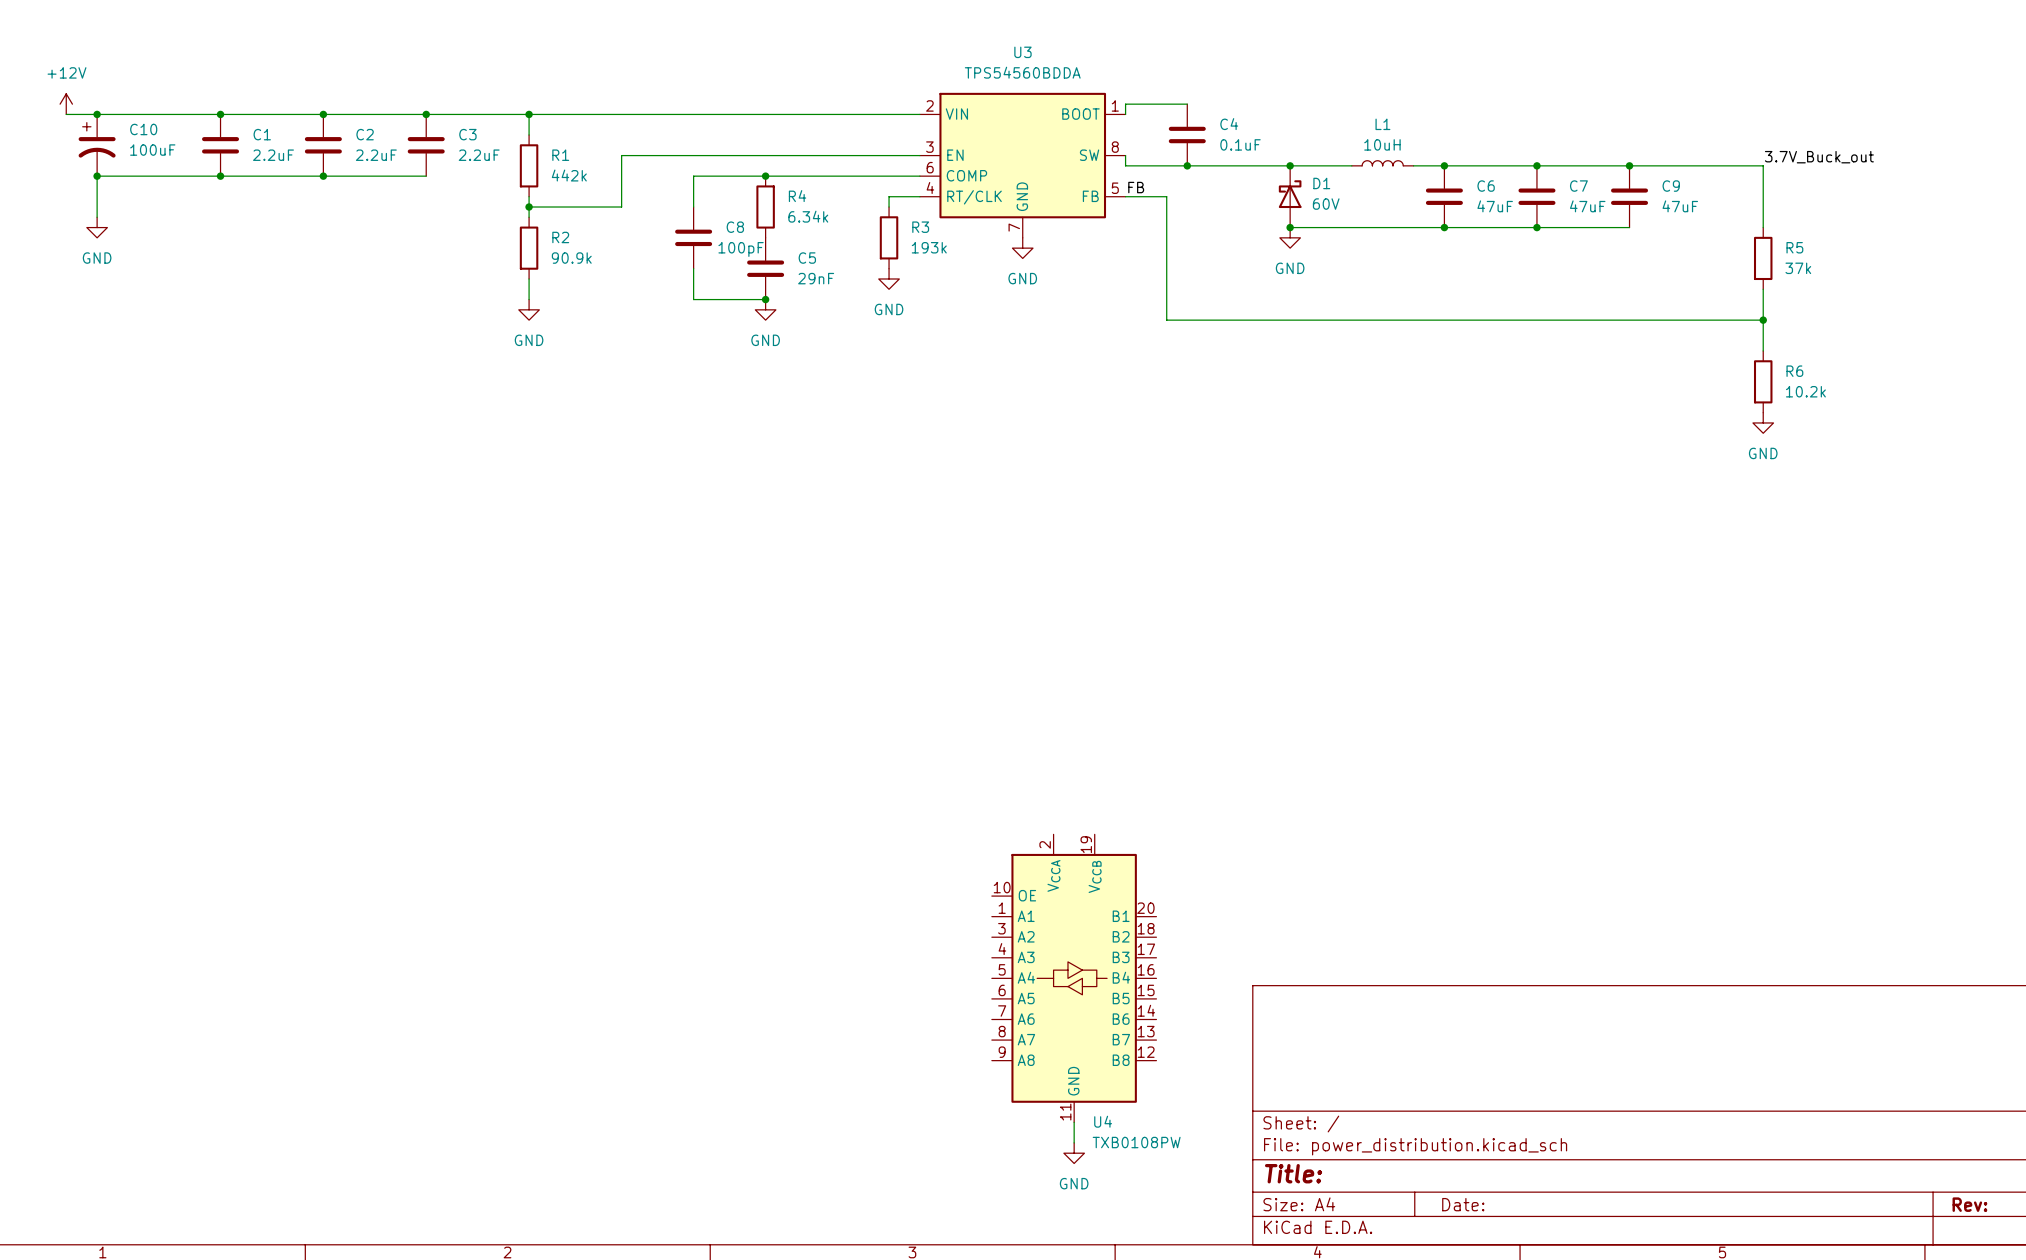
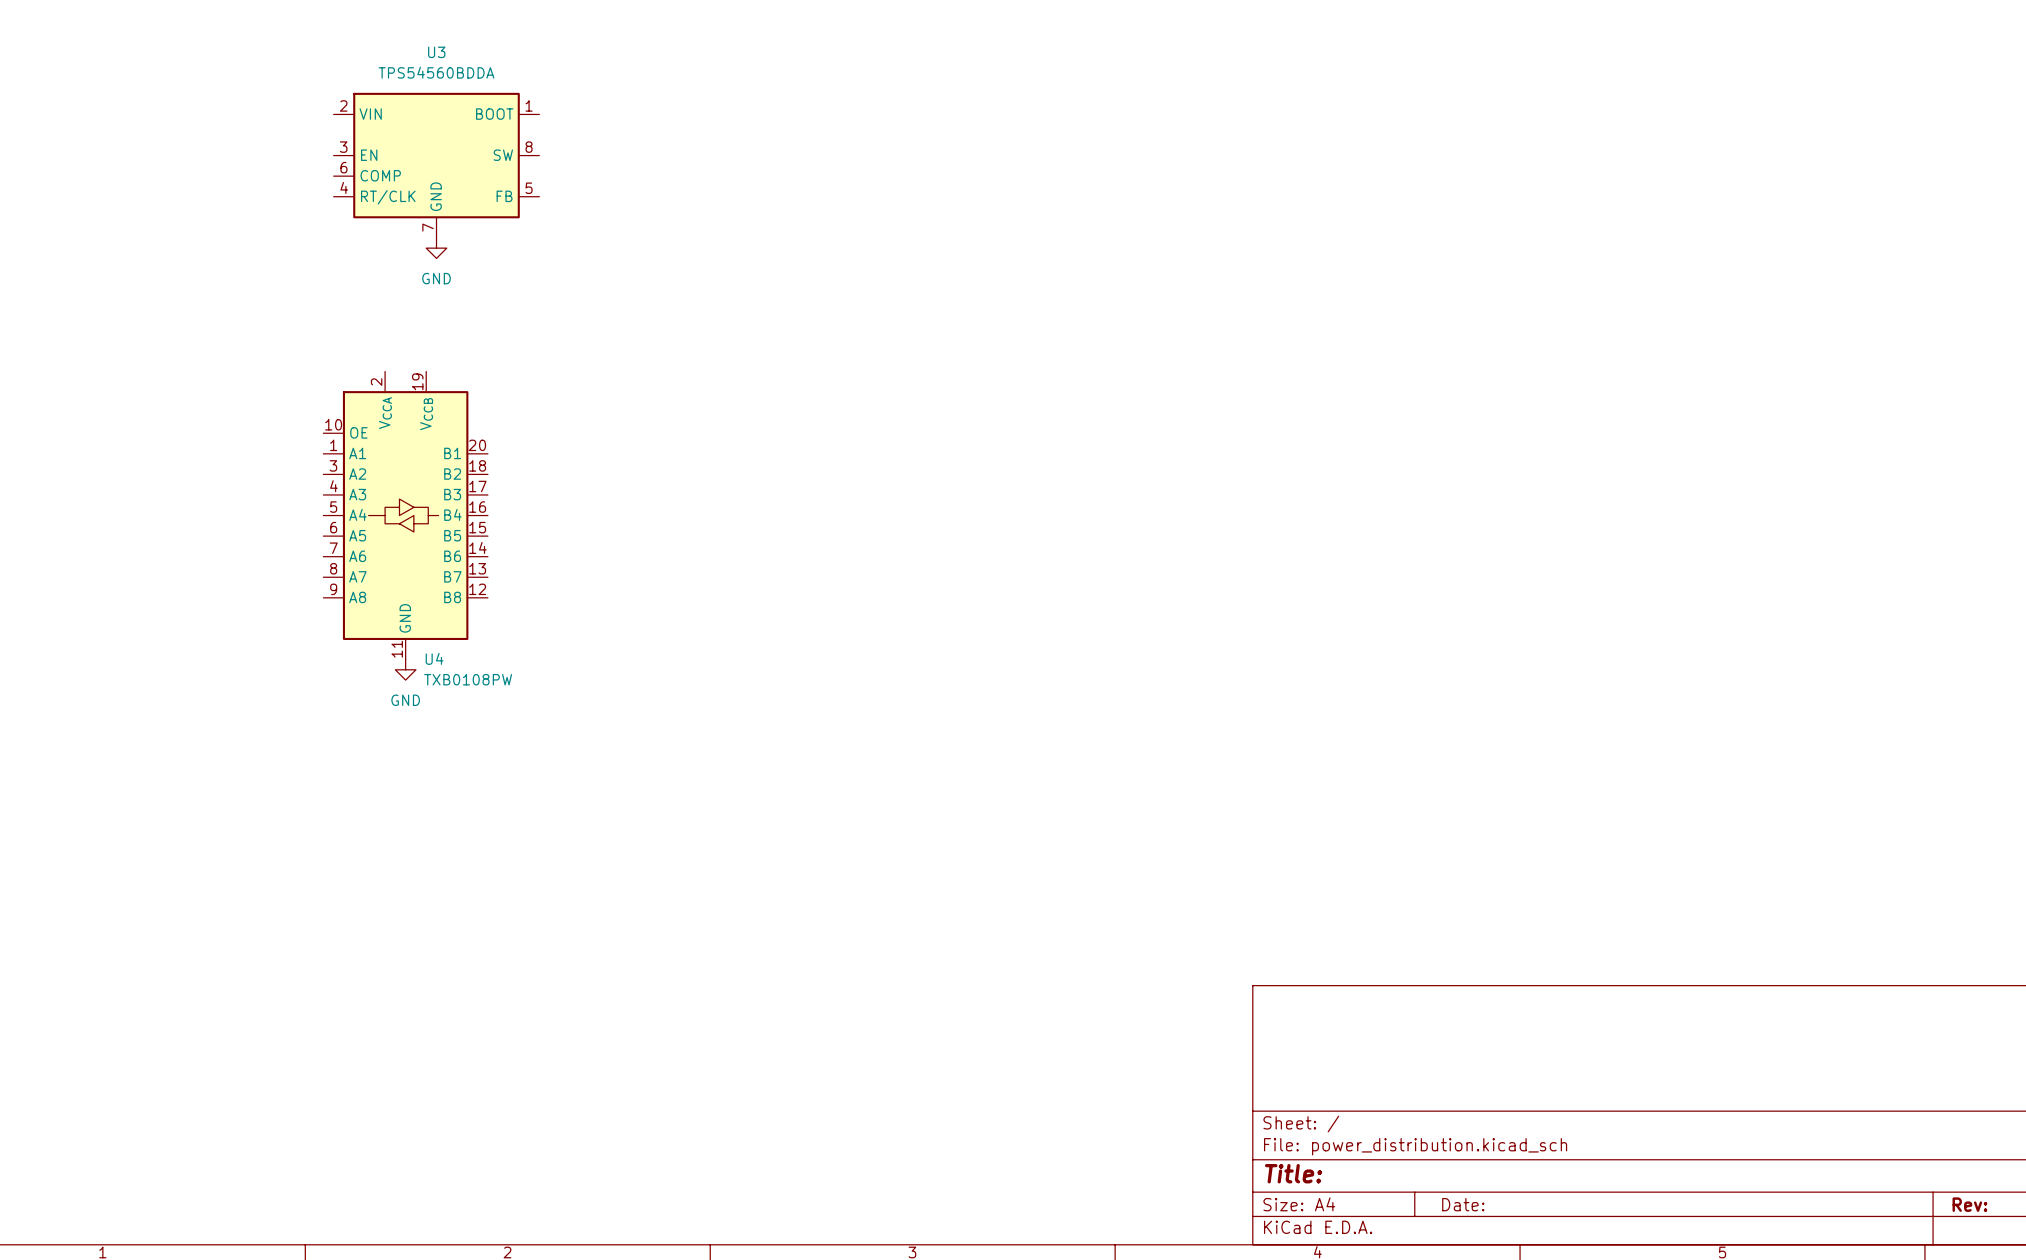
power symbol: +12V (66, 104) -> none
wire: (1187, 104) (1125, 104) (1125, 114) -> none
wire: (66, 114) (919, 114) -> none
junction: (97, 114) -> none
junction: (220, 114) -> none
junction: (323, 114) -> none
junction: (426, 114) -> none
wire: (529, 114) (529, 135) -> none
junction: (529, 114) -> none
C4: 0.1uF (1187, 135) -> none
C10: 100uF (97, 145) -> none
C1: 2.2uF (220, 145) -> none
C2: 2.2uF (323, 145) -> none
C3: 2.2uF (426, 145) -> none
wire: (919, 155) (621, 155) (621, 207) (529, 207) -> none
wire: (1125, 155) (1125, 165) (1351, 165) -> none
label: 3.7V_Buck_out (1819, 157) -> none
L1: 10uH (1382, 163) -> none
R1: 442k (529, 165) -> none
U3 position: (1022, 165) -> (436, 165)
junction: (1187, 165) -> none
junction: (1290, 165) -> none
wire: (1413, 165) (1763, 165) (1763, 227) -> none
junction: (1444, 165) -> none
junction: (1536, 165) -> none
junction: (1629, 165) -> none
junction: (97, 176) -> none
junction: (220, 176) -> none
junction: (323, 176) -> none
wire: (426, 176) (97, 176) (97, 217) -> none
junction: (765, 176) -> none
wire: (919, 176) (693, 176) (693, 207) -> none
label: FB (1136, 187) -> none
wire: (529, 196) (529, 217) -> none
wire: (919, 196) (889, 196) (889, 207) -> none
wire: (1125, 196) (1166, 196) (1166, 320) (1763, 320) -> none
D1: 60V (1290, 196) -> none
C6: 47uF (1444, 196) -> none
C7: 47uF (1536, 196) -> none
C9: 47uF (1629, 196) -> none
junction: (529, 207) -> none
R4: 6.34k (765, 207) -> none
power symbol: GND (97, 227) -> none
wire: (1290, 227) (1629, 227) -> none
junction: (1290, 227) -> none
junction: (1444, 227) -> none
junction: (1536, 227) -> none
C8: 100pF (693, 237) -> none
R3: 193k (889, 237) -> none
power symbol: GND (1290, 237) -> none
R2: 90.9k (529, 248) -> none
power symbol: GND (1022, 248) -> none
R5: 37k (1763, 258) -> none
wire: (693, 268) (693, 299) (765, 299) -> none
C5: 29nF (765, 268) -> none
wire: (529, 278) (529, 299) -> none
power symbol: GND (889, 278) -> none
wire: (1763, 289) (1763, 350) -> none
junction: (765, 299) -> none
power symbol position: GND (529, 309) -> GND (436, 248)
power symbol: GND (765, 309) -> none
junction: (1763, 320) -> none
R6: 10.2k (1763, 381) -> none
power symbol: GND (1763, 422) -> none
power symbol: none -> GND (405, 669)
U4 position: (1074, 978) -> (405, 515)
wire: (1074, 1122) (1074, 1142) -> none
power symbol: GND (1074, 1153) -> none

